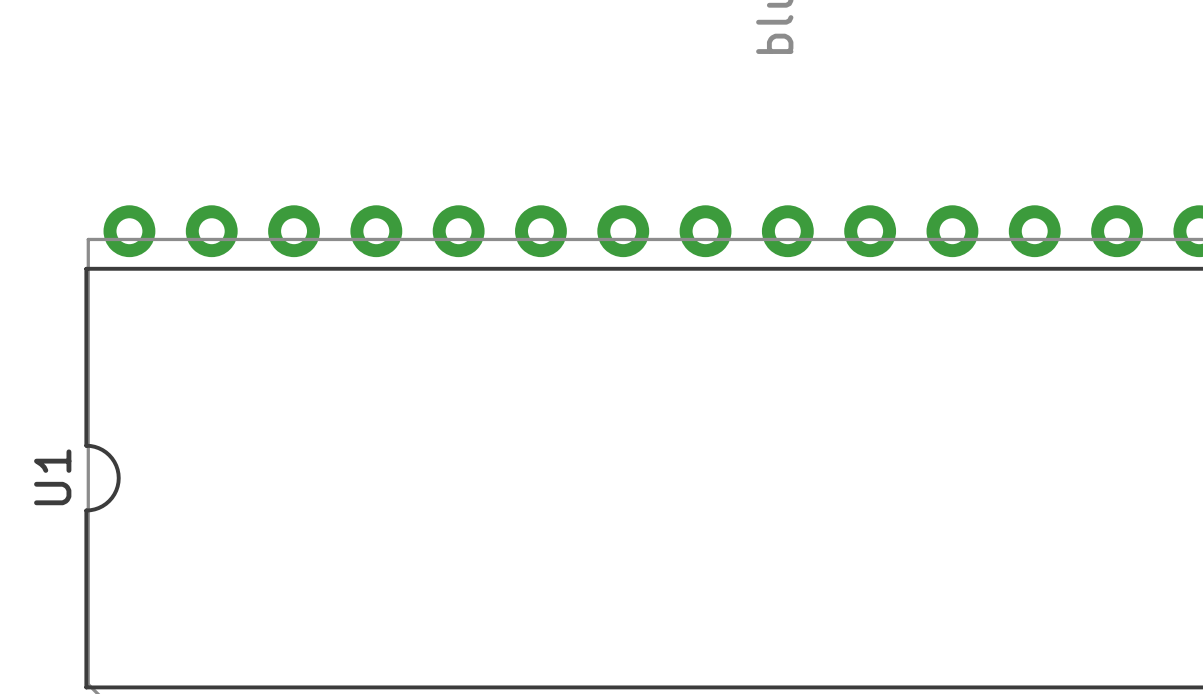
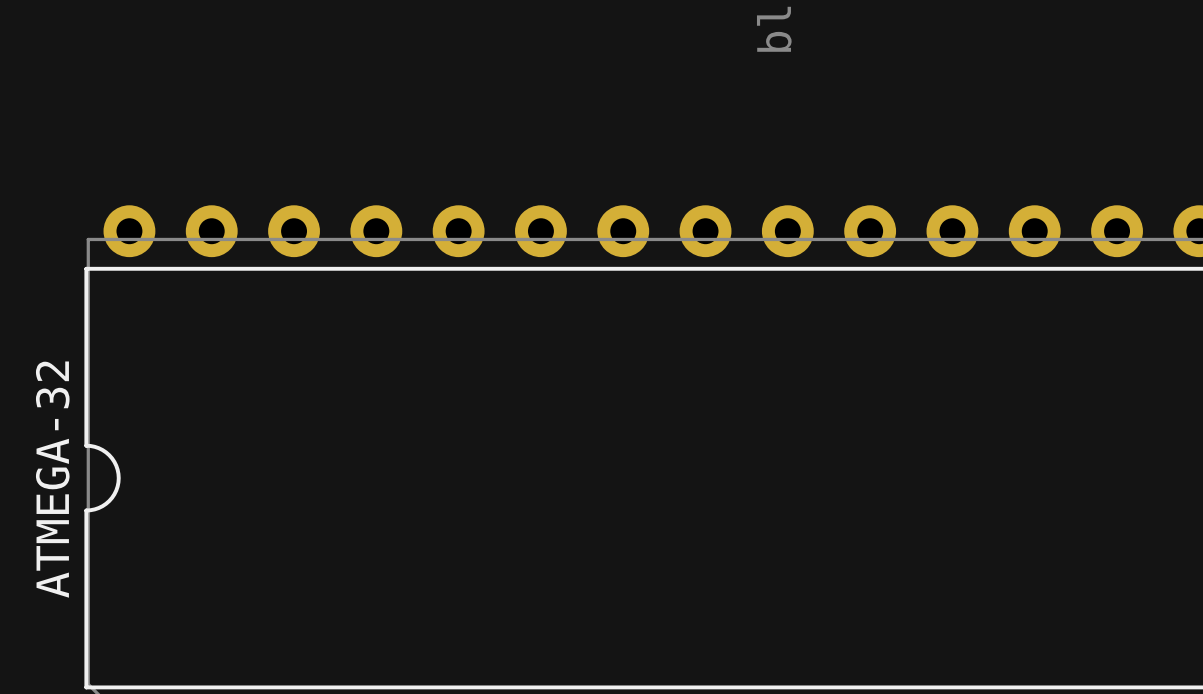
U1 name: U1 (52, 477) -> ATMEGA-32 (52, 479)

